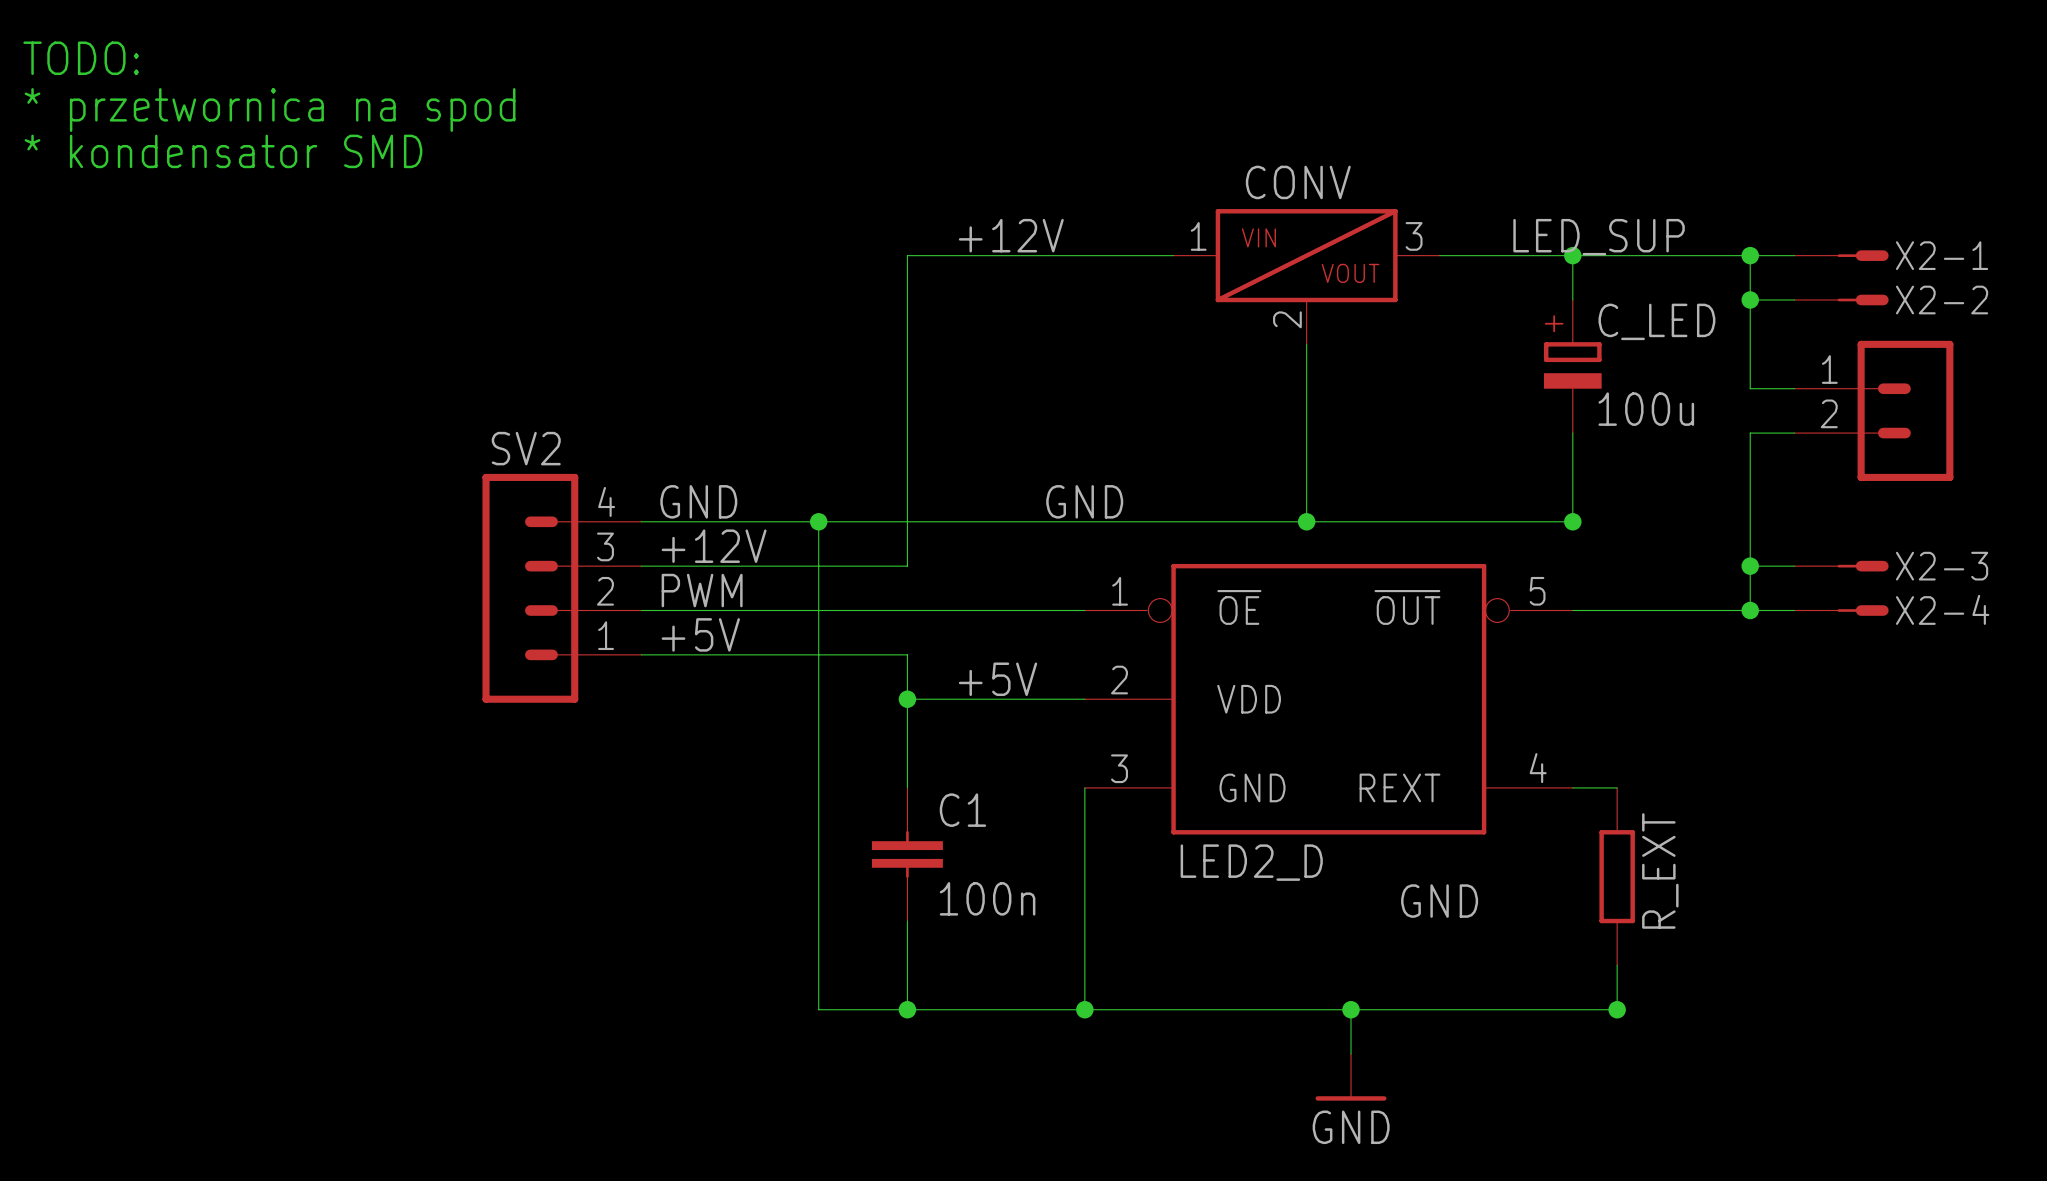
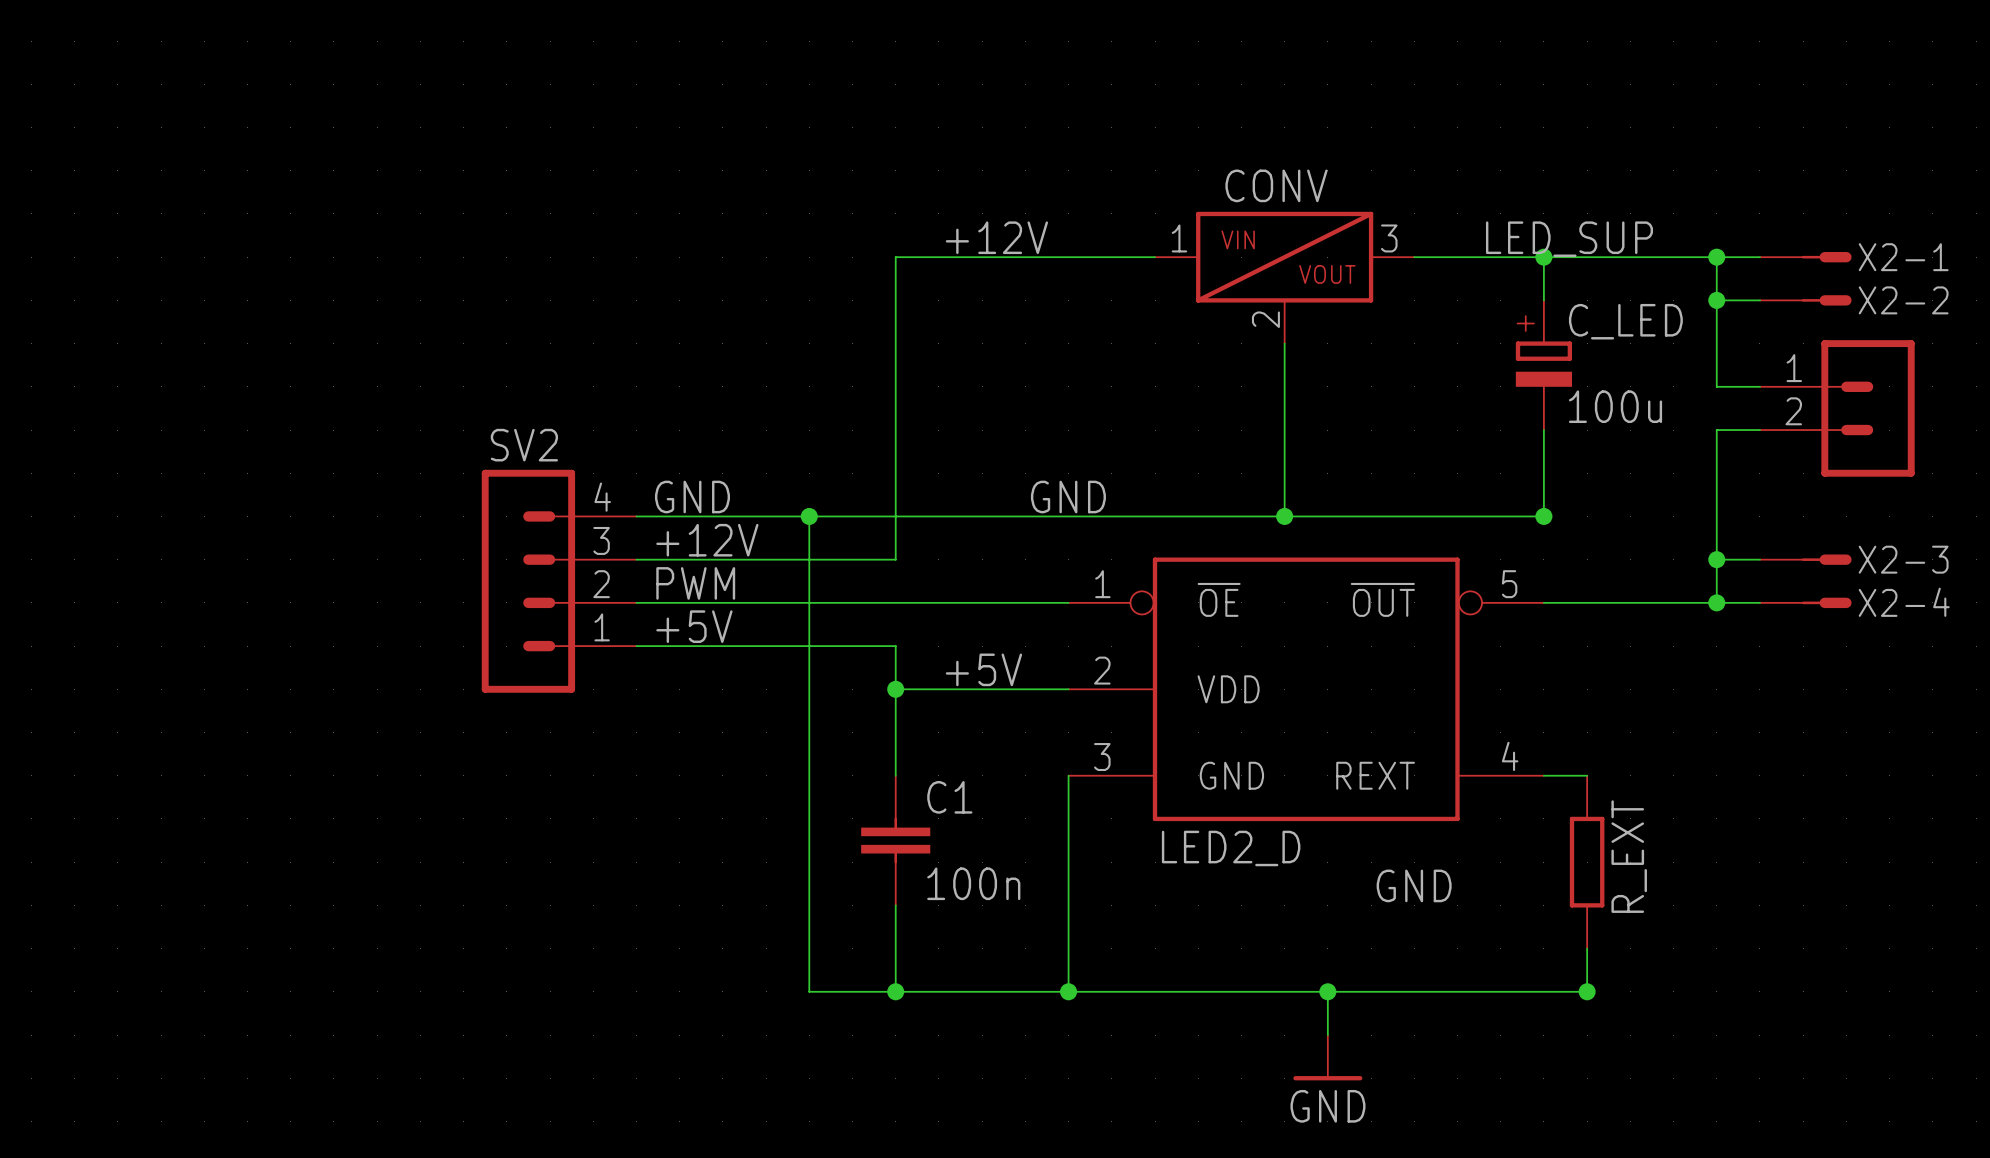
text: TODO: (81, 58) -> none
text: * przetwornica na spod (270, 109) -> none
text: * kondensator SMD (223, 151) -> none

